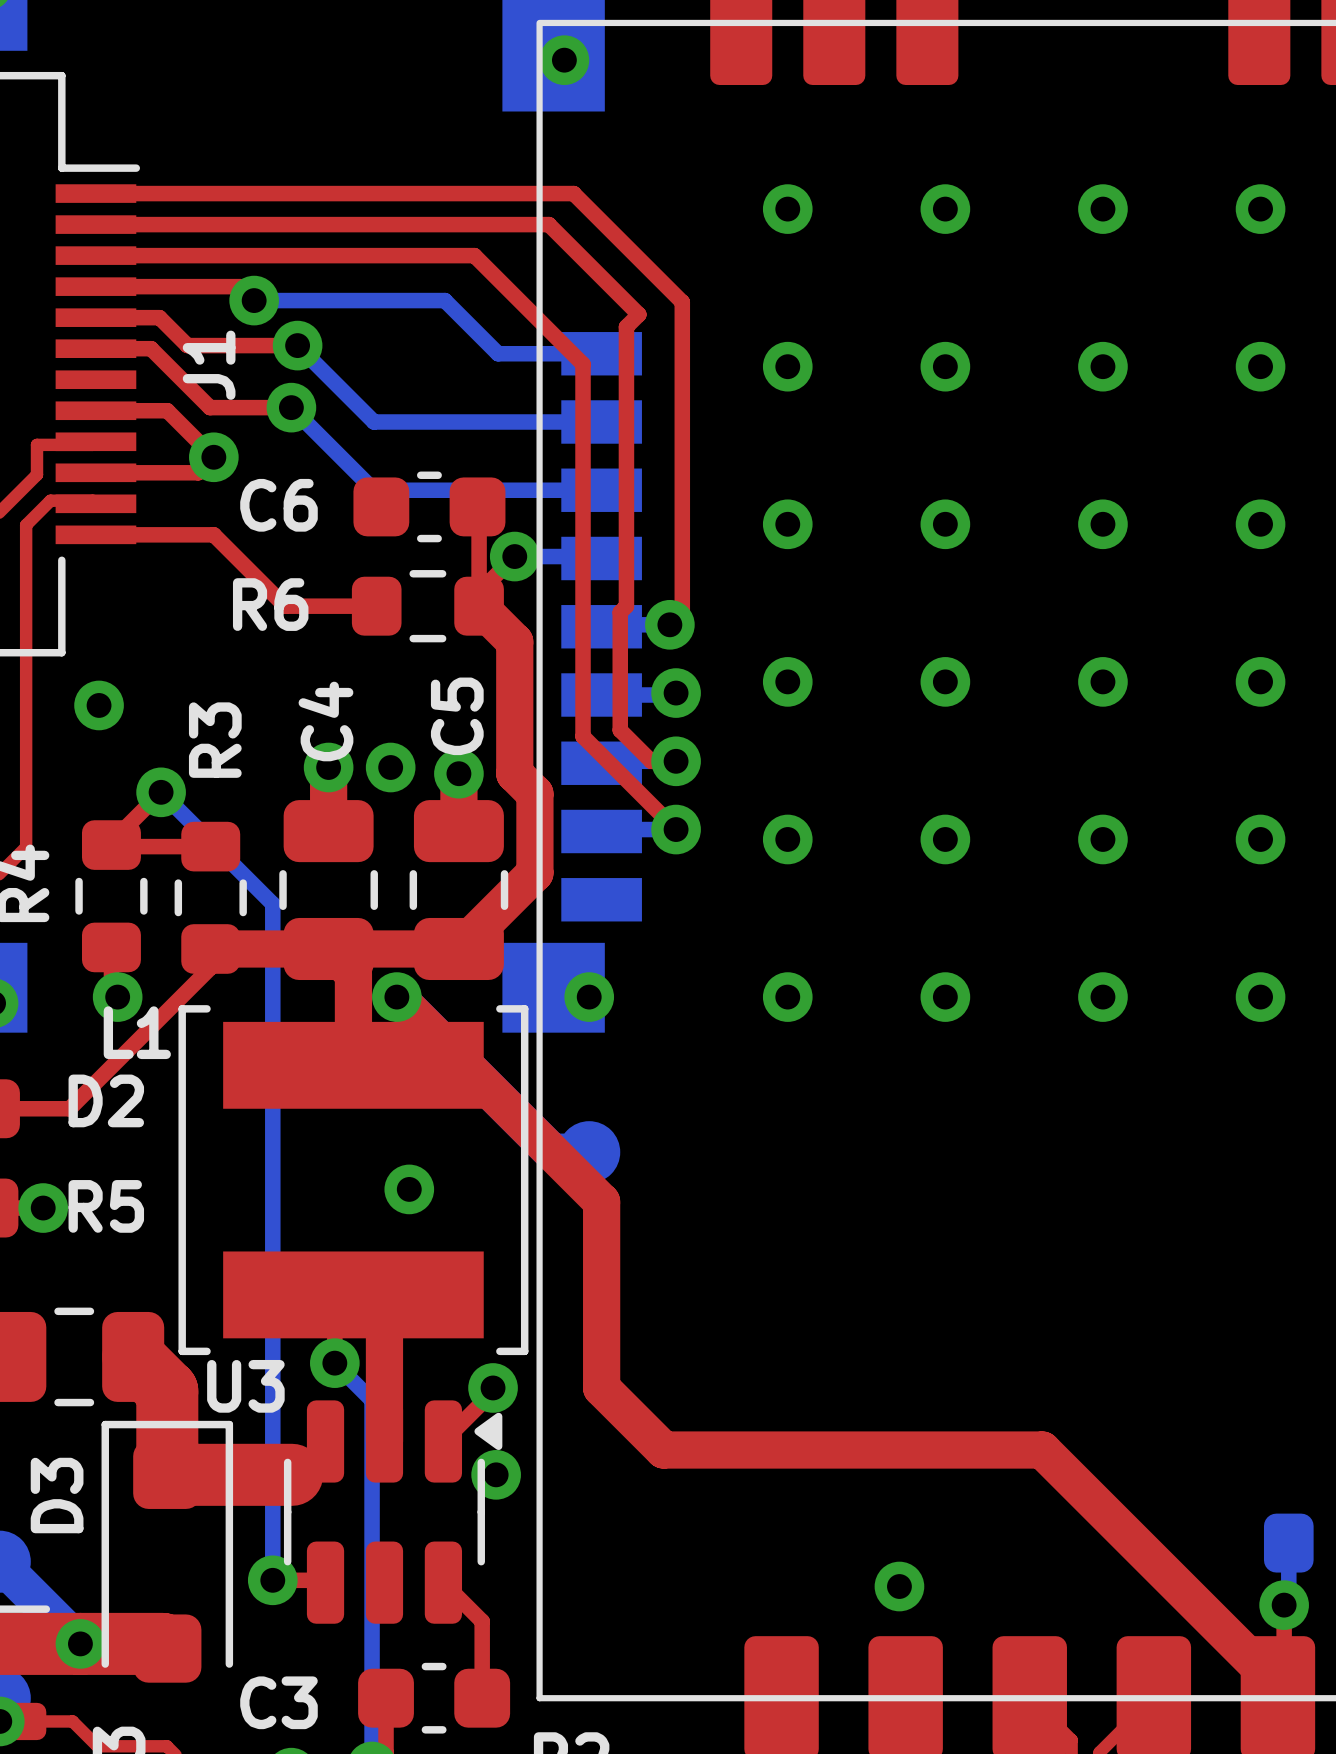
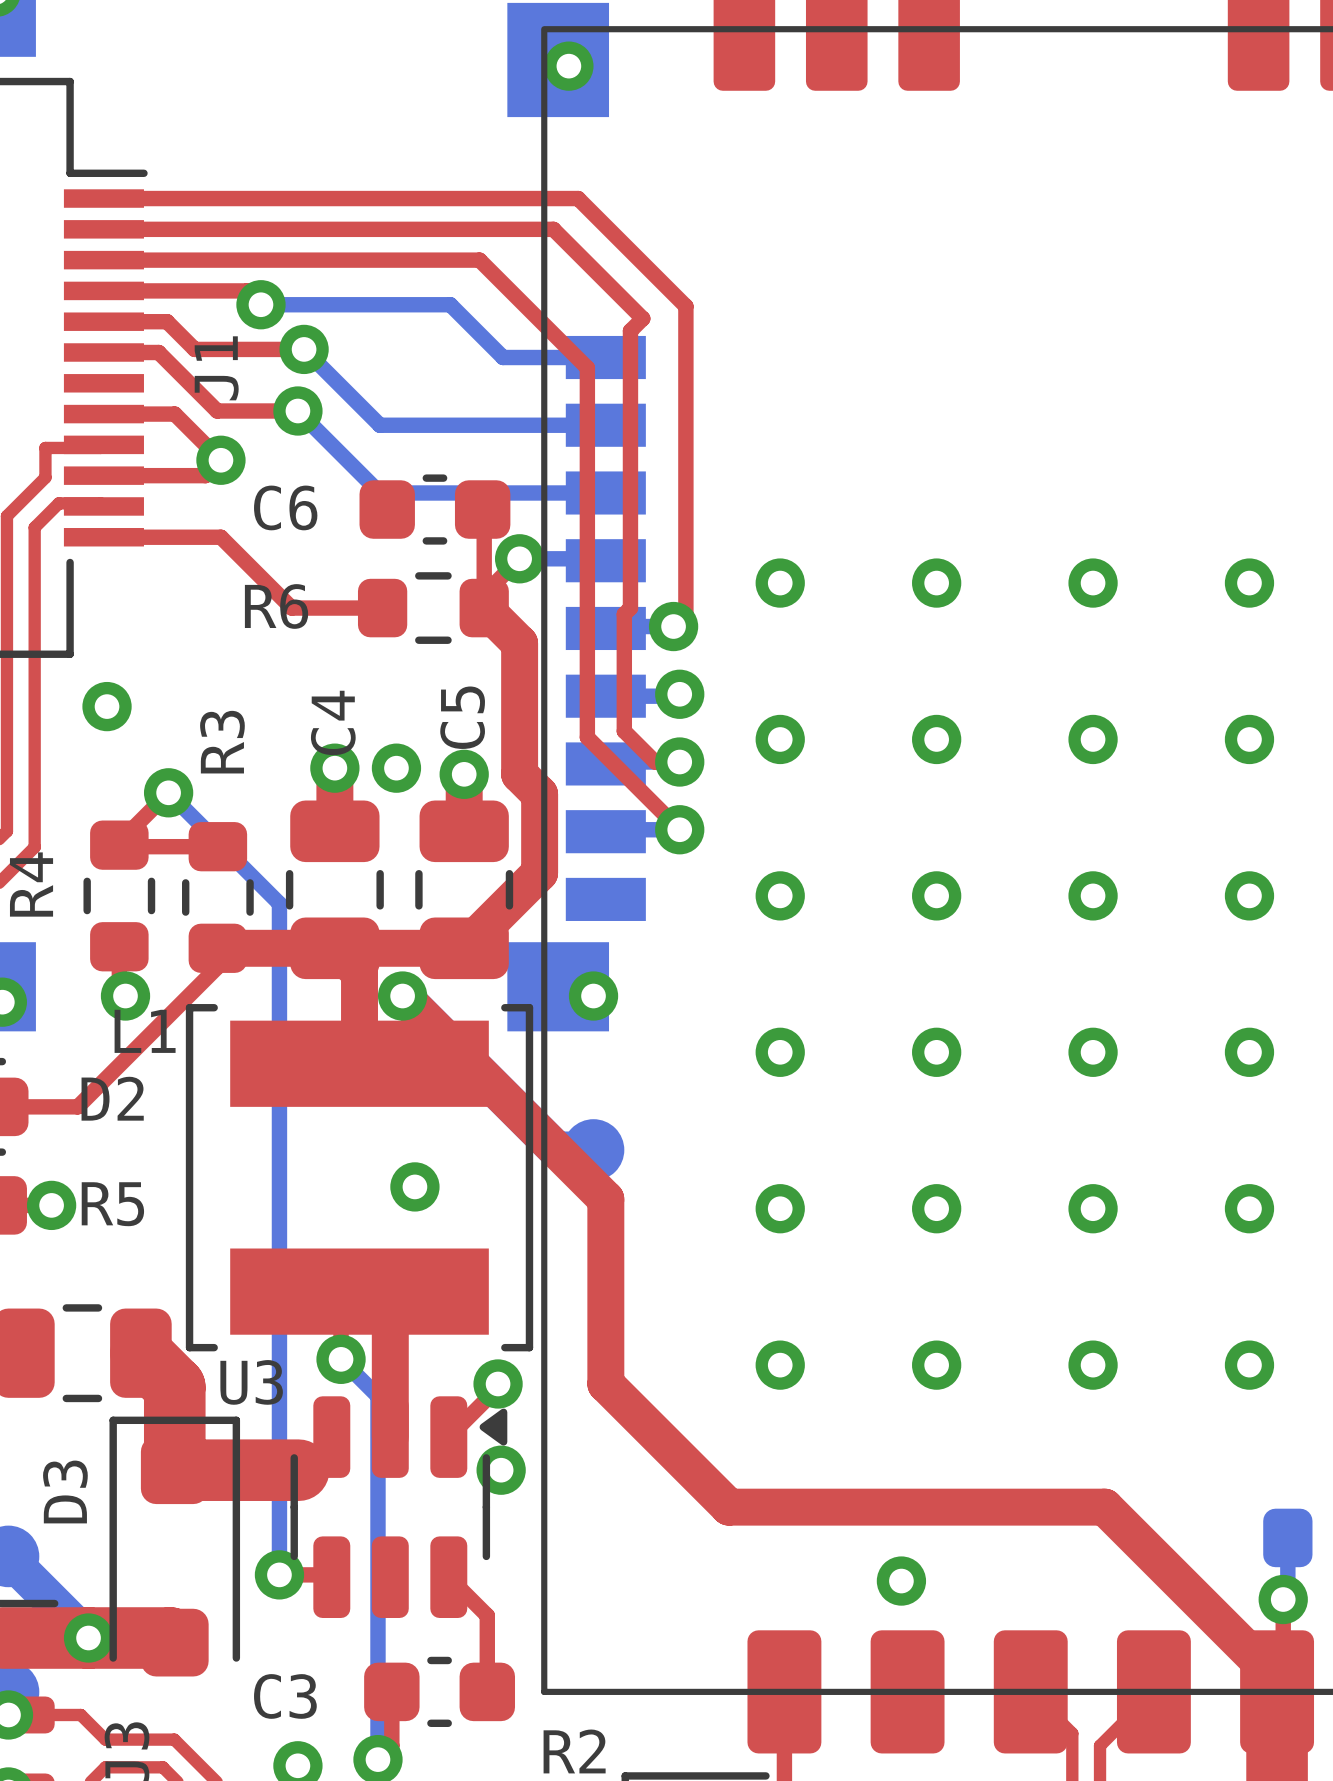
via: (787, 209) -> none
via: (945, 209) -> none
via: (1102, 209) -> none
via: (1260, 209) -> none
via: (787, 366) -> none
via: (945, 366) -> none
via: (1102, 366) -> none
via: (1260, 366) -> none
via: (787, 524) -> none
via: (945, 524) -> none
via: (1102, 524) -> none
via: (1260, 524) -> none
via: none -> (780, 583)
via: none -> (936, 583)
via: none -> (1093, 583)
via: none -> (1249, 583)
via: (787, 681) -> none
via: (945, 681) -> none
via: (1102, 681) -> none
via: (1260, 681) -> none
via: none -> (780, 739)
via: none -> (936, 739)
via: none -> (1093, 739)
via: none -> (1249, 739)
via: (787, 839) -> none
via: (945, 839) -> none
via: (1102, 839) -> none
via: (1260, 839) -> none
via: none -> (780, 895)
via: none -> (936, 895)
via: none -> (1093, 895)
via: none -> (1249, 895)
via: (787, 997) -> none
via: (945, 997) -> none
via: (1102, 997) -> none
via: (1260, 997) -> none
via: none -> (780, 1052)
via: none -> (936, 1052)
via: none -> (1093, 1052)
via: none -> (1249, 1052)
via: none -> (780, 1208)
via: none -> (936, 1208)
via: none -> (1093, 1208)
via: none -> (1249, 1208)
via: none -> (780, 1365)
via: none -> (936, 1365)
via: none -> (1093, 1365)
via: none -> (1249, 1365)
top track: (663, 1450) (1042, 1450) (1104, 1512) -> (667, 1445) (729, 1507) (1104, 1507)

